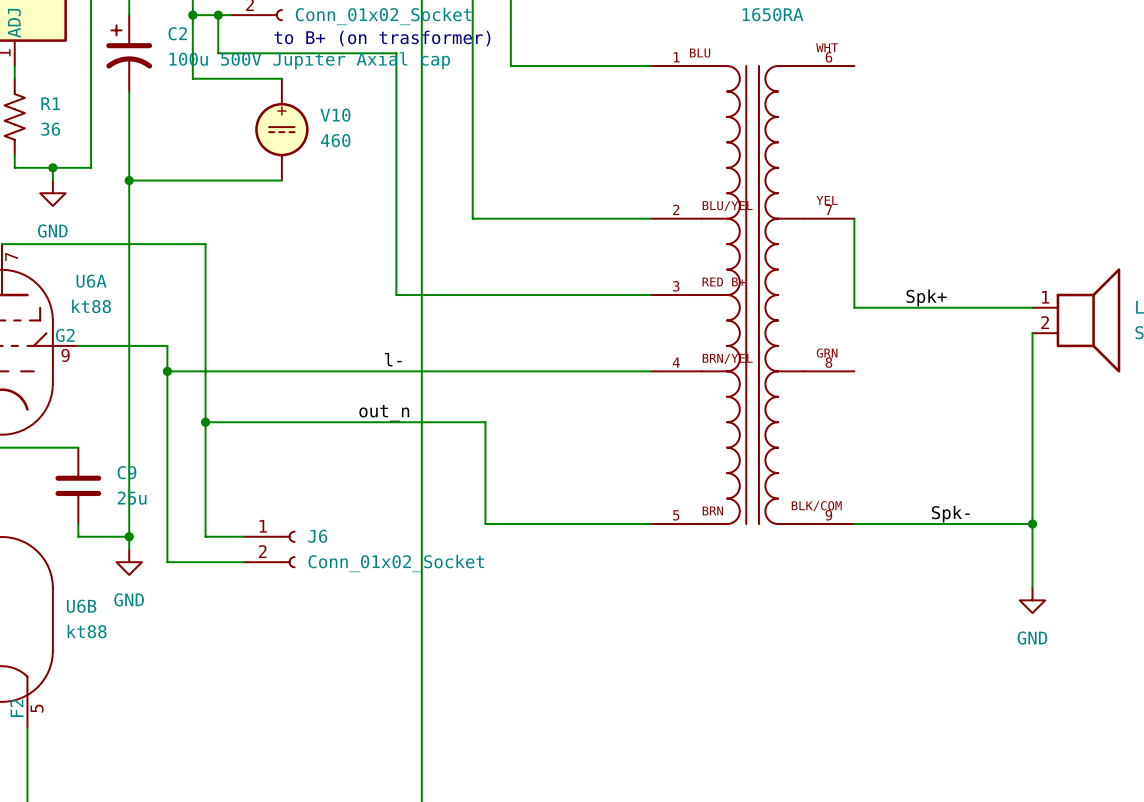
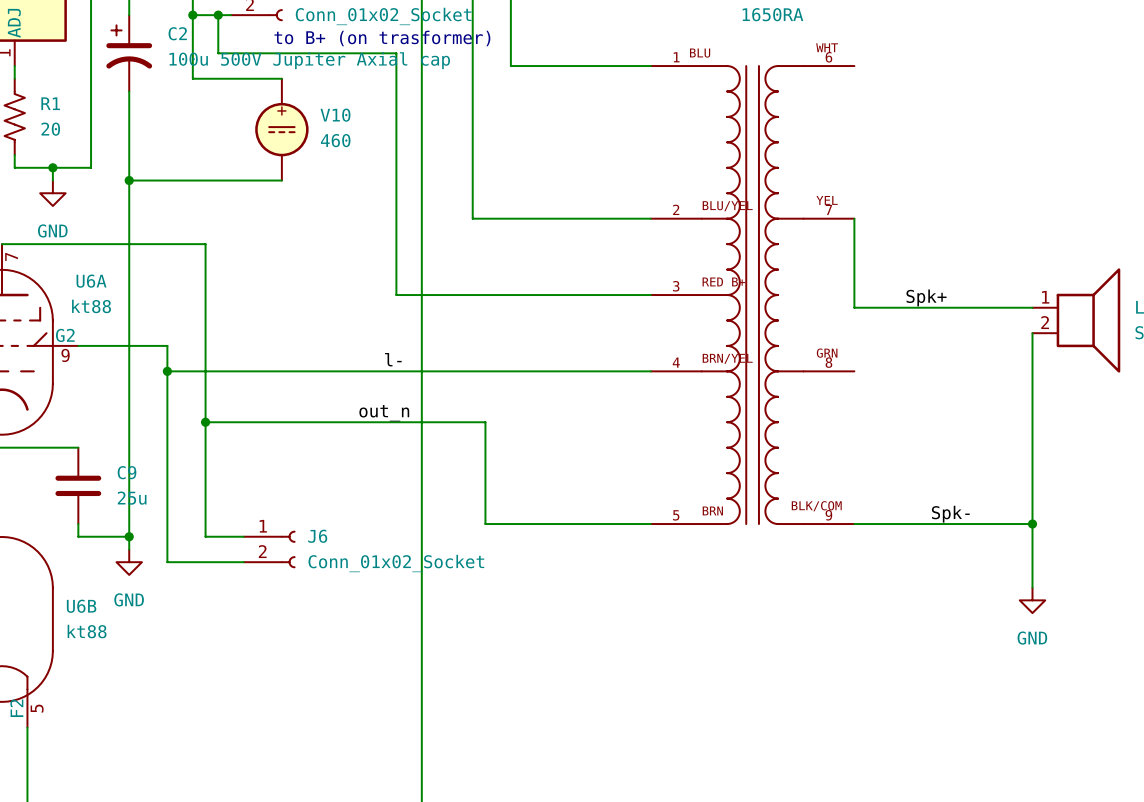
R1 value: 36 (50, 129) -> 20 (50, 129)

